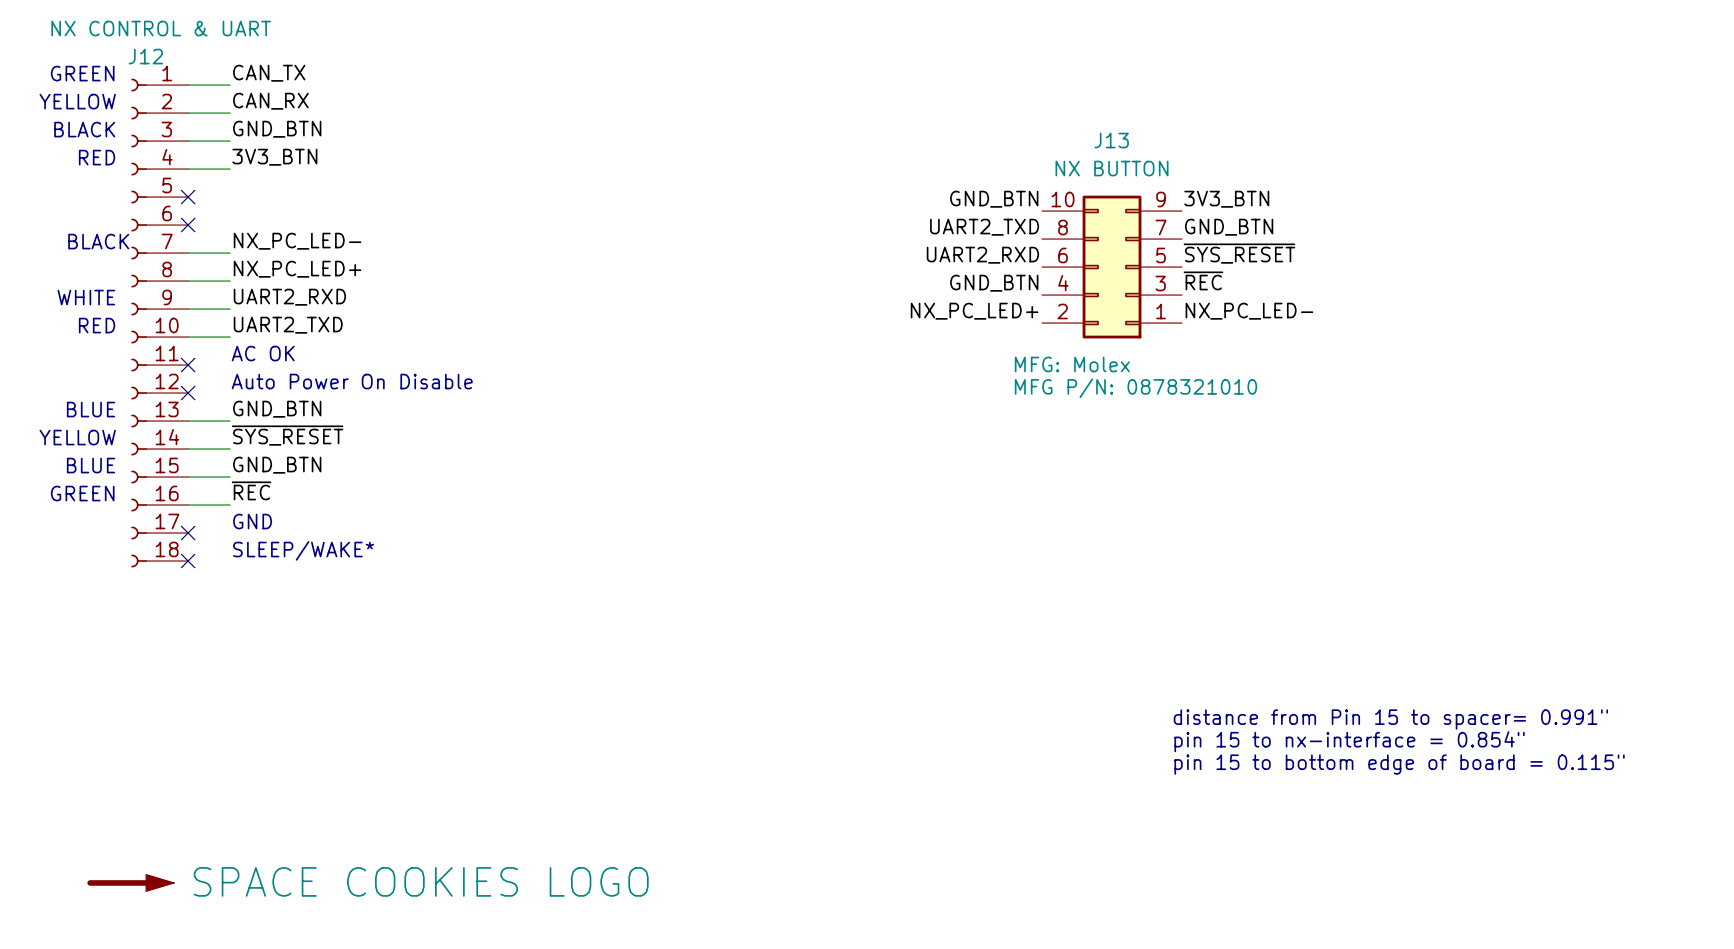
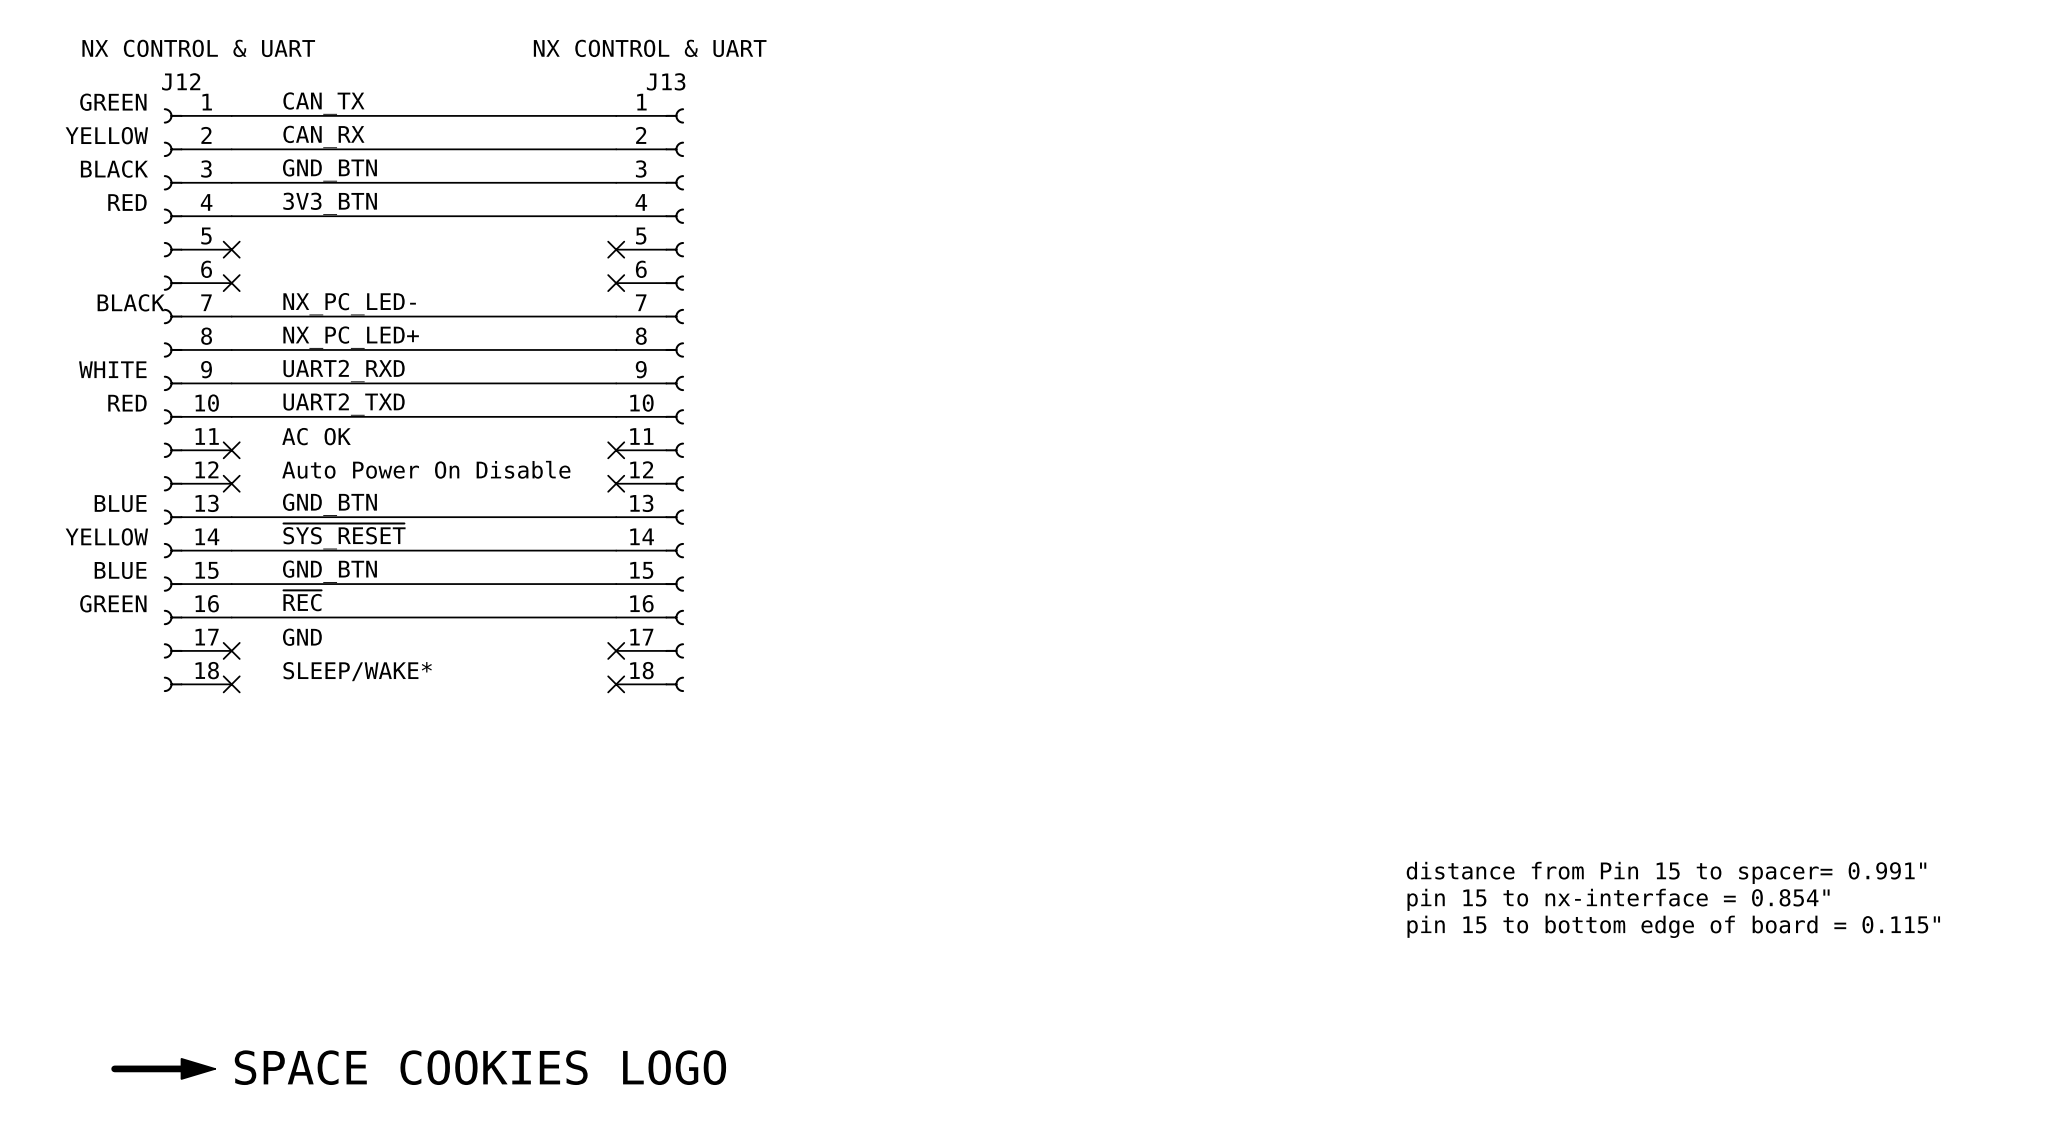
wire: none -> (281, 115) (616, 115)
wire: none -> (281, 149) (616, 149)
J13 name position: J13 (1111, 140) -> J13 (666, 81)
wire: none -> (281, 182) (616, 182)
J13 value: NX BUTTON (1112, 168) -> NX CONTROL & UART (650, 48)
wire: none -> (281, 216) (616, 216)
J13 symbol: [1042, 195, 1183, 339] -> [616, 108, 685, 693]
no-connect mark: none -> (616, 249)
label: GND_BTN (994, 199) -> none
label: 3V3_BTN (1226, 199) -> none
no-connect mark: none -> (616, 283)
label: UART2_TXD (984, 227) -> none
label: GND_BTN (1229, 227) -> none
wire: none -> (281, 316) (616, 316)
label: ~{SYS_RESET} (1239, 253) -> none
label: UART2_RXD (982, 255) -> none
label: ~{REC} (1203, 280) -> none
wire: none -> (281, 349) (616, 349)
label: GND_BTN (994, 283) -> none
wire: none -> (281, 383) (616, 383)
label: NX_PC_LED+ (974, 311) -> none
label: NX_PC_LED- (1249, 311) -> none
wire: none -> (281, 416) (616, 416)
J13 text: MFG: Molex (1072, 364) -> none
no-connect mark: none -> (616, 450)
J13 text: MFG P/N: 0878321010 (1135, 388) -> none
no-connect mark: none -> (616, 483)
wire: none -> (281, 517) (616, 517)
wire: none -> (281, 550) (616, 550)
wire: none -> (281, 584) (616, 584)
wire: none -> (281, 617) (616, 617)
no-connect mark: none -> (616, 650)
no-connect mark: none -> (616, 684)

